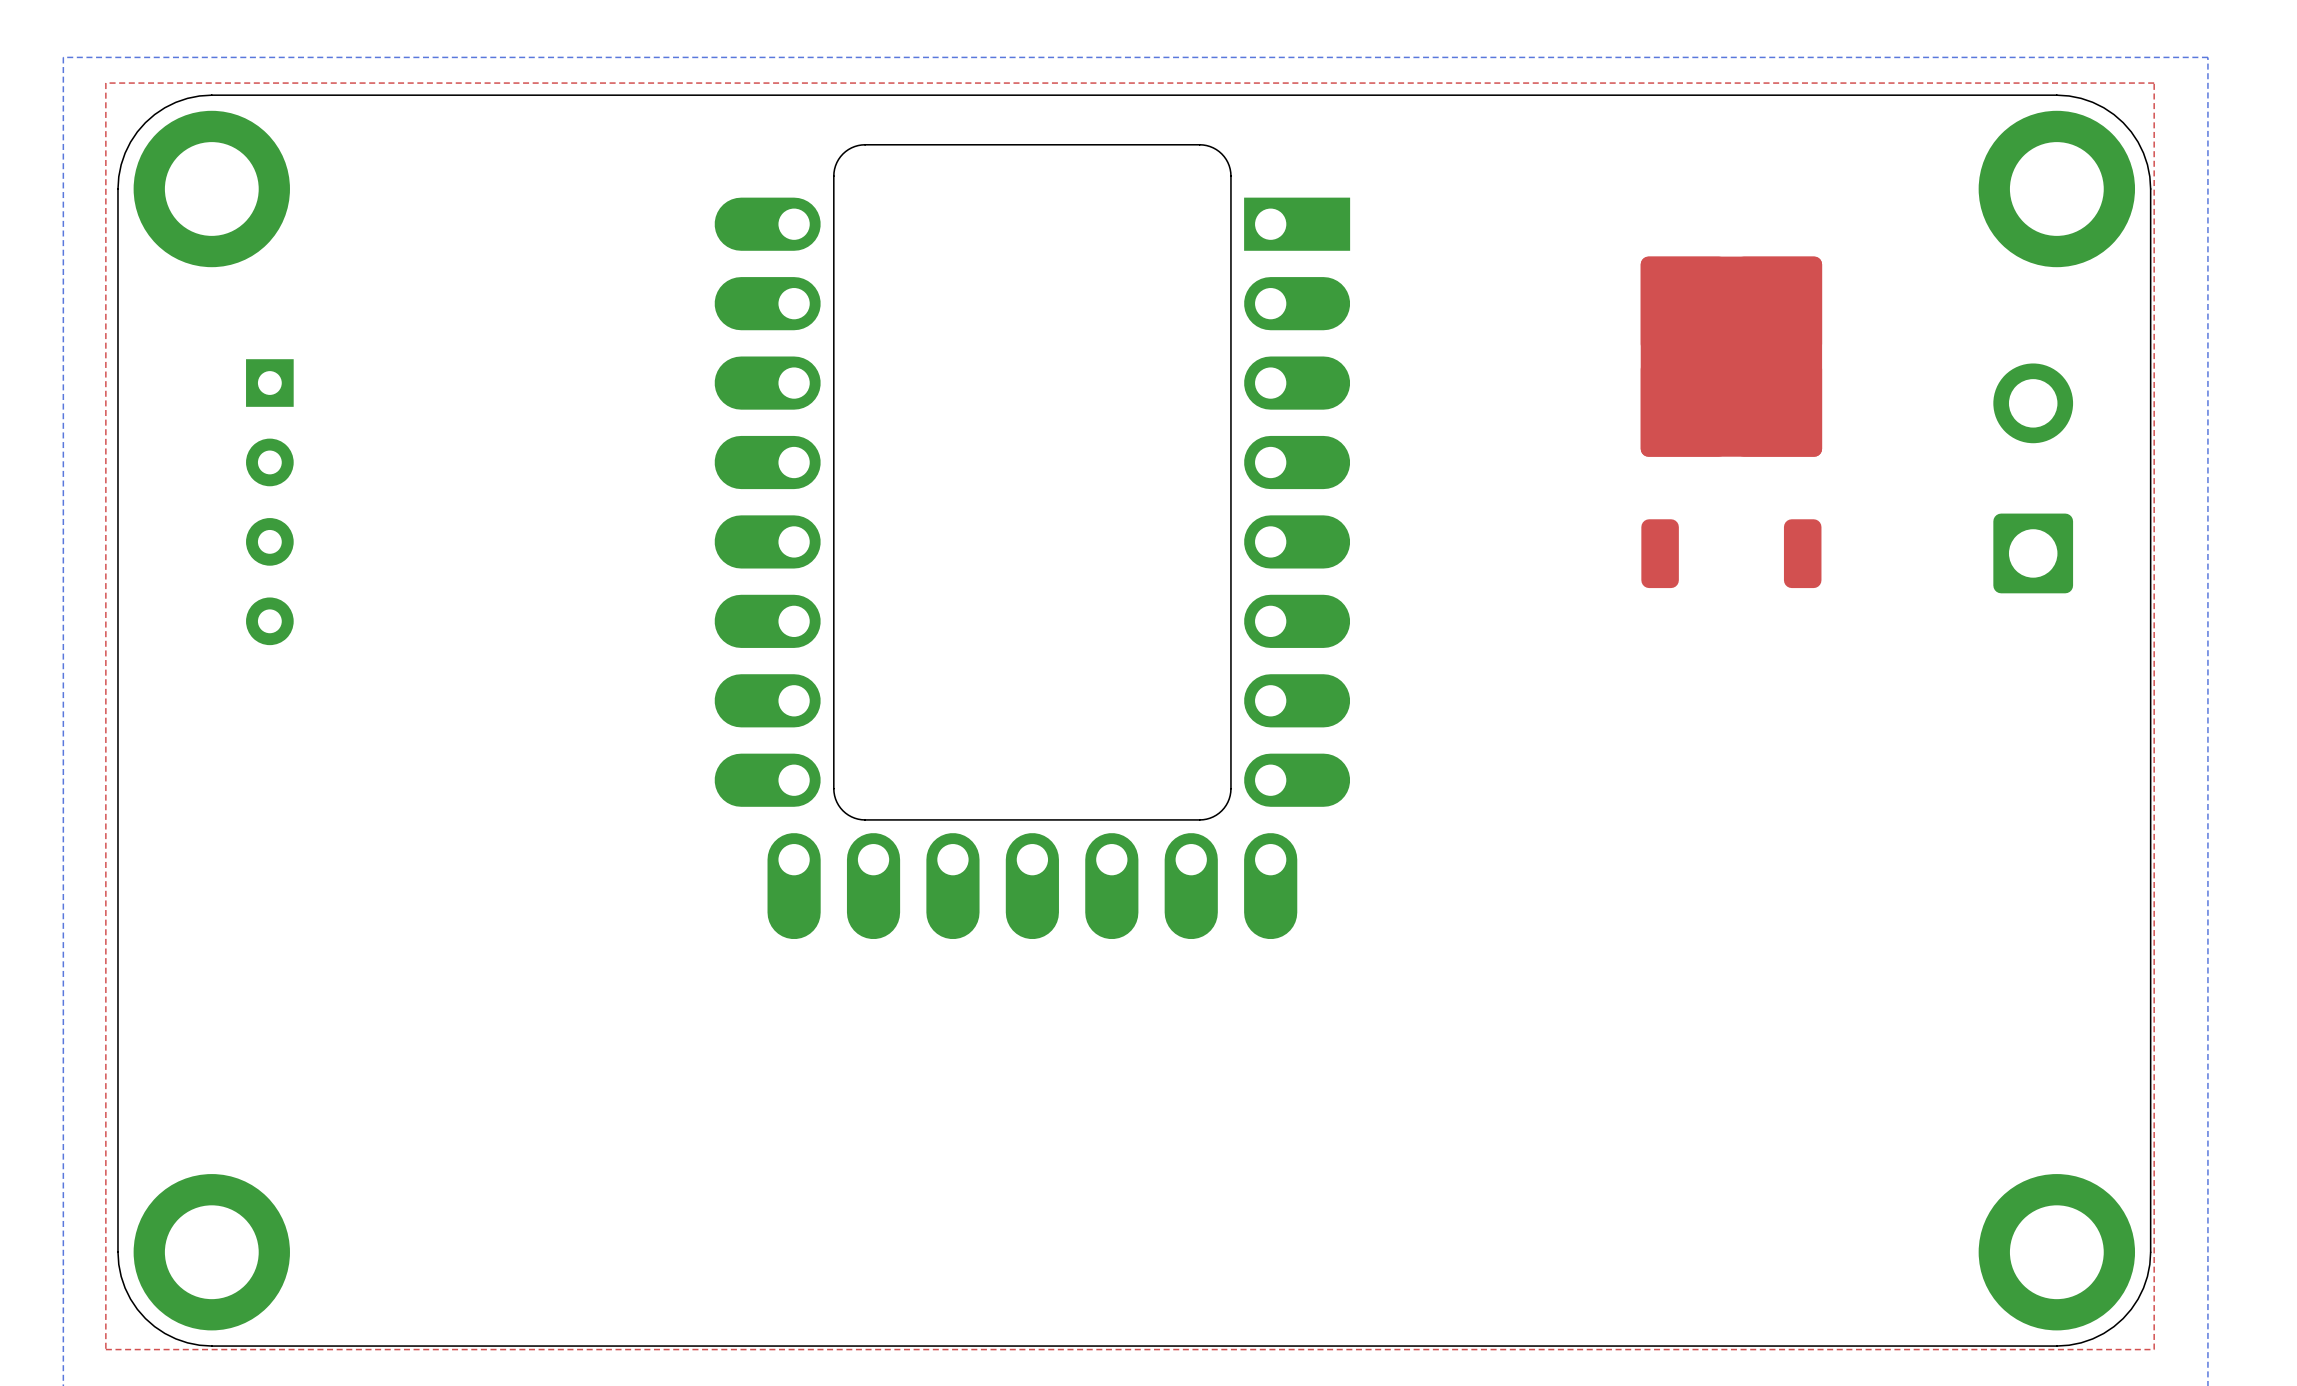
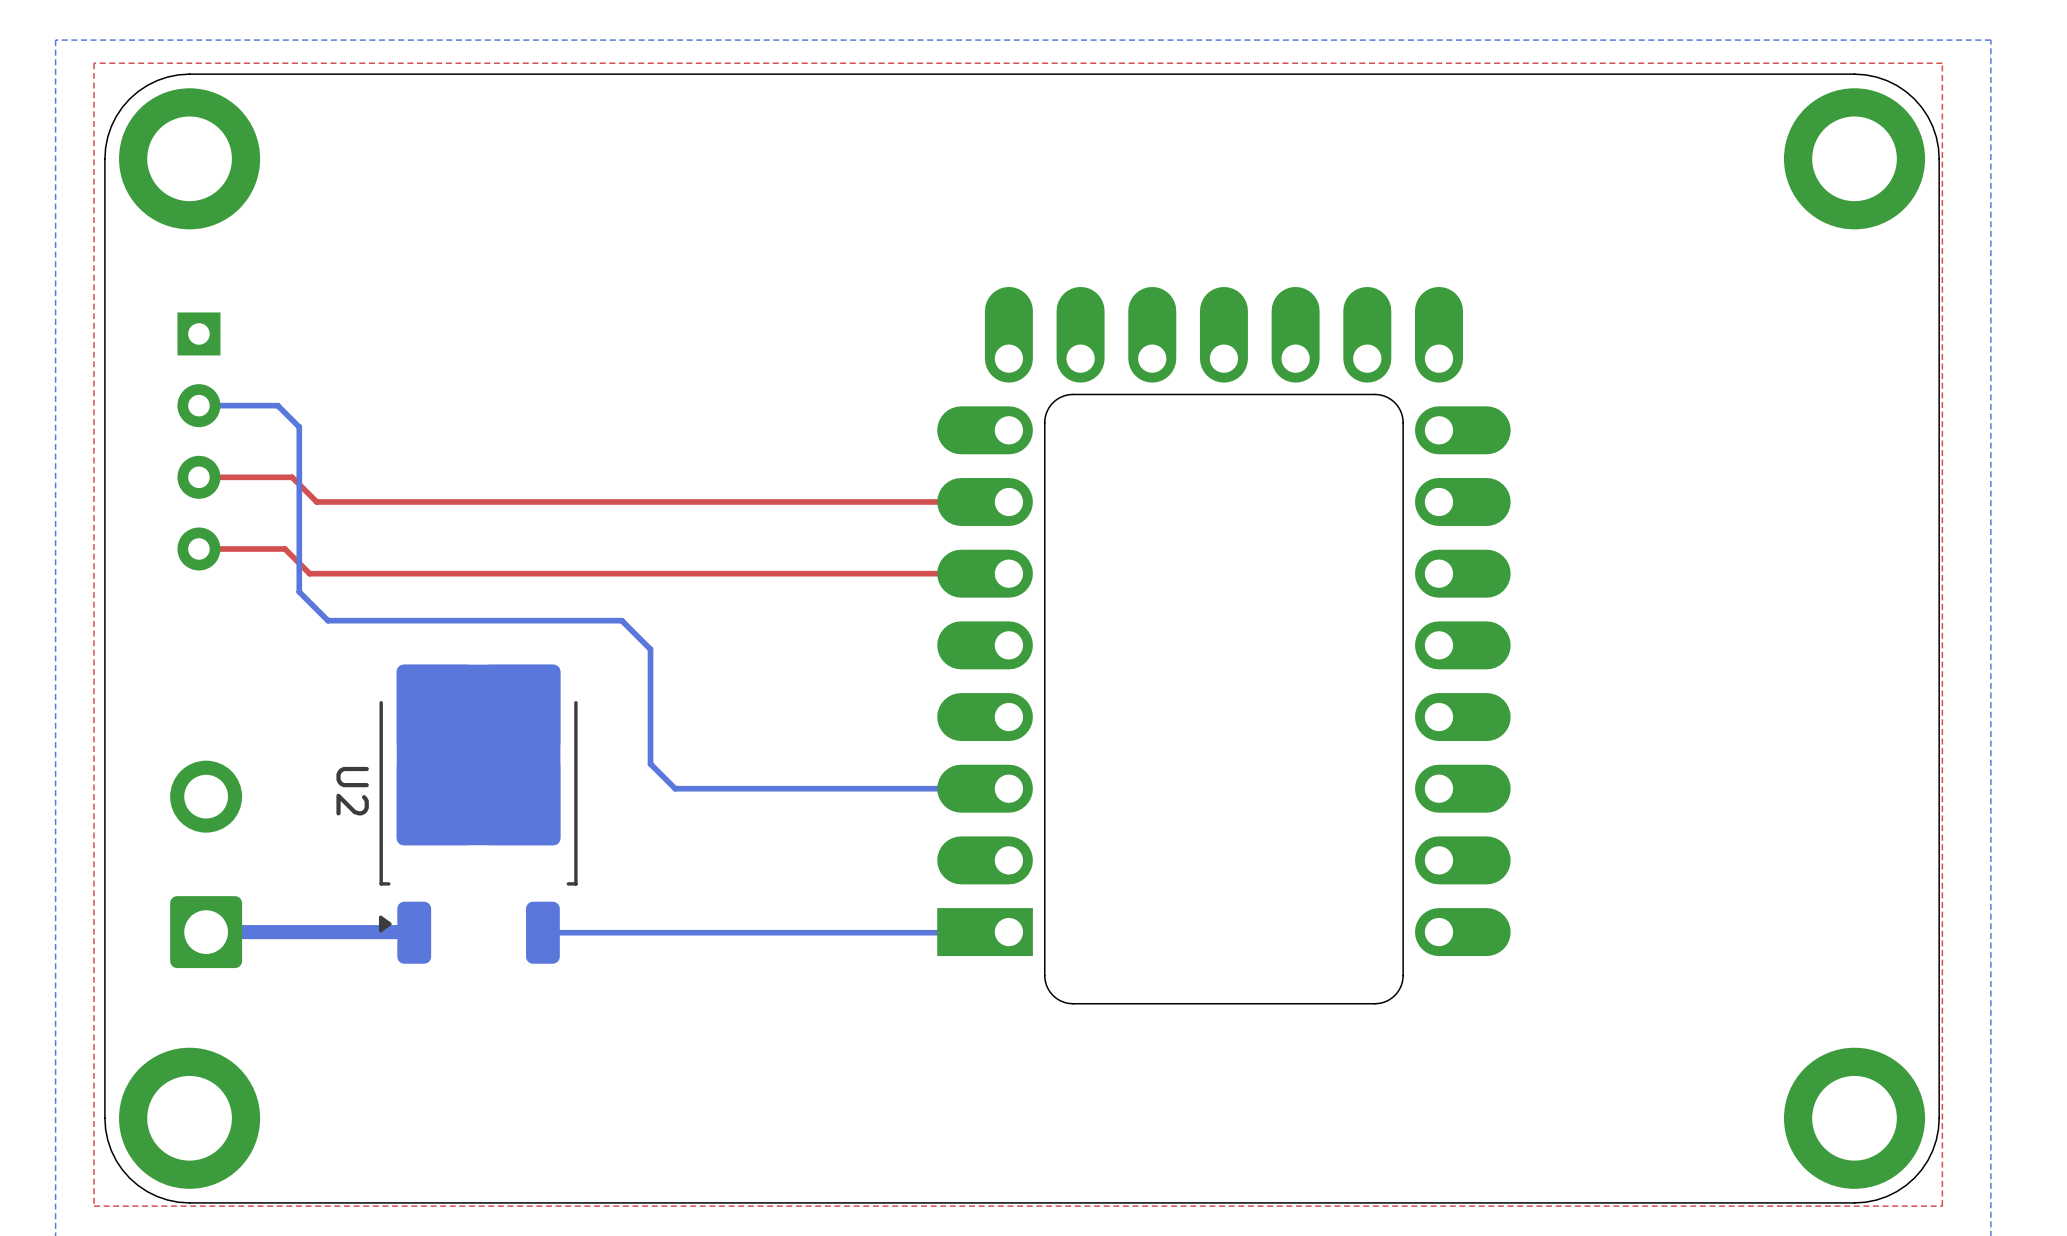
part: (1731, 422) -> none
bottom track: none -> (198, 405) (277, 405) (299, 427) (299, 592) (327, 620) (621, 620) (650, 649) (650, 764) (675, 788) (1008, 788)
part: (2033, 478) -> none
part position: (269, 502) -> (198, 441)
top track: none -> (198, 477) (292, 477) (316, 501) (1008, 501)
part rotation: 0° (1032, 541) -> 180° (1223, 645)
top track: none -> (198, 548) (284, 548) (309, 573) (1008, 573)
U2: none -> (478, 814)
part: none -> (206, 864)
bottom track: none -> (206, 932) (414, 932)
bottom track: none -> (1008, 932) (542, 932)

